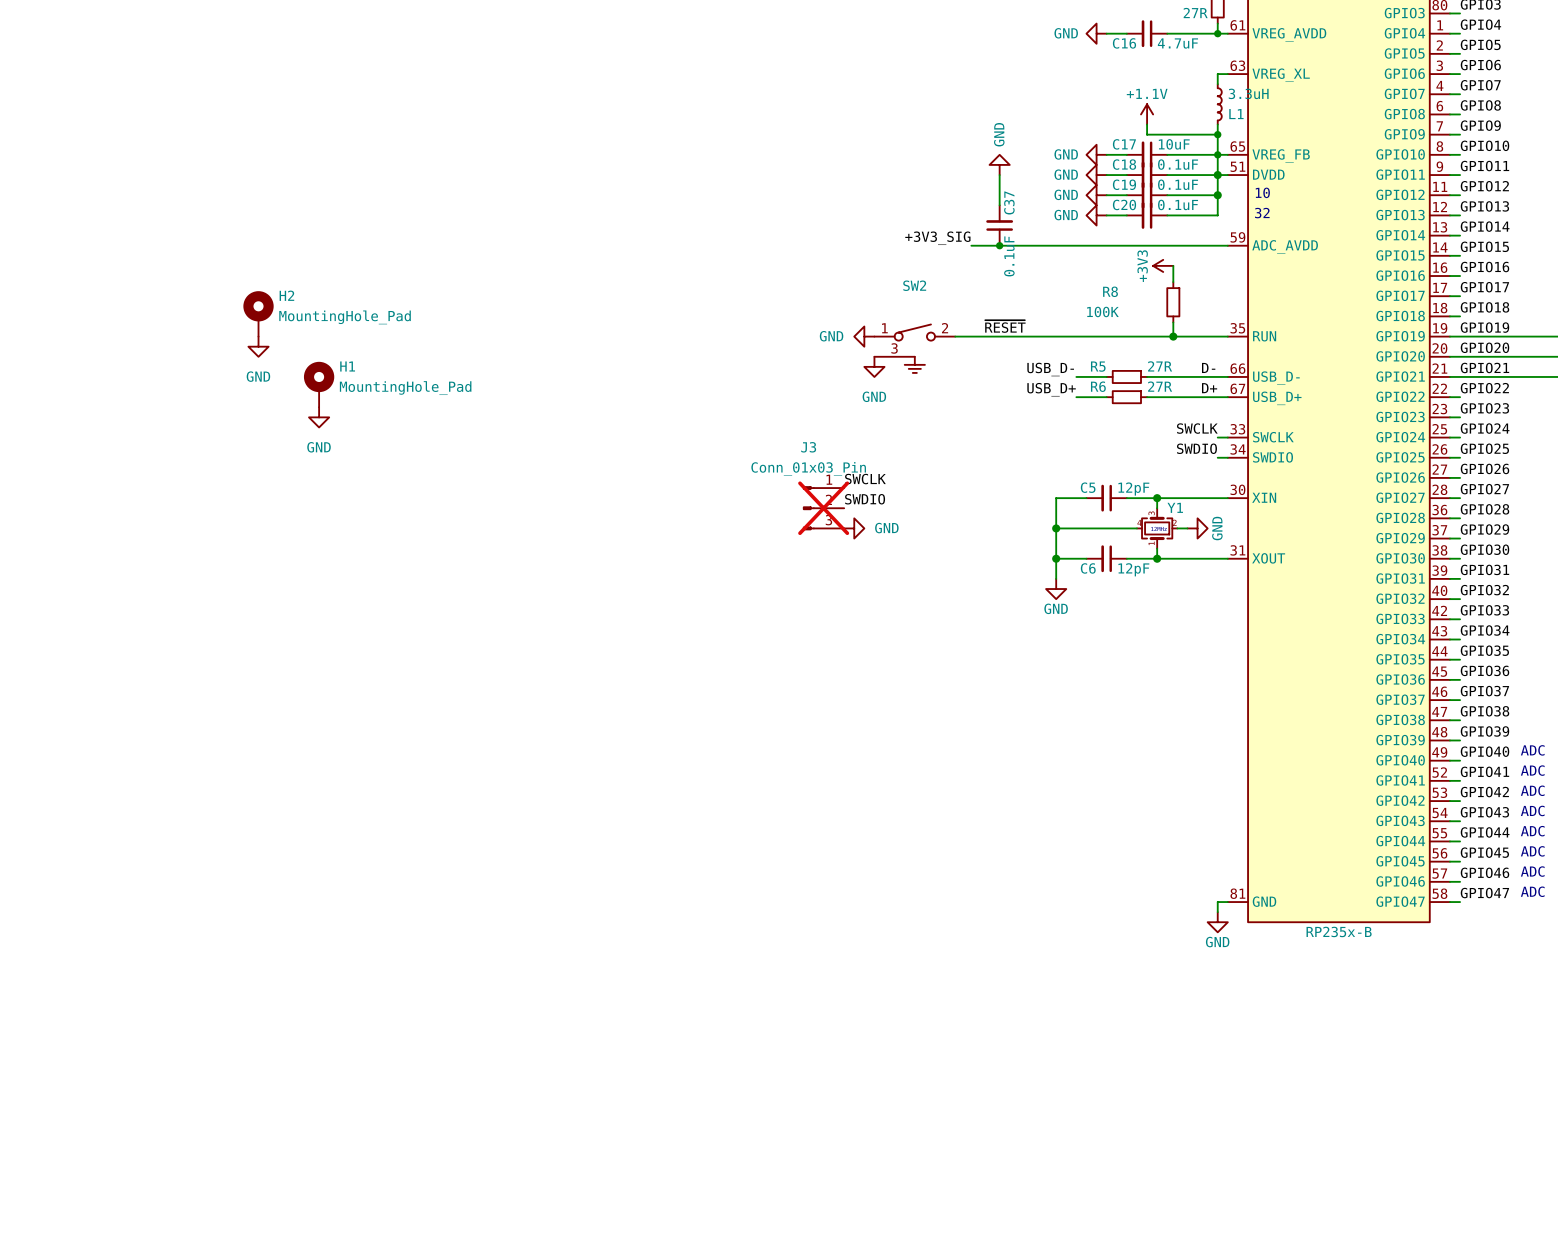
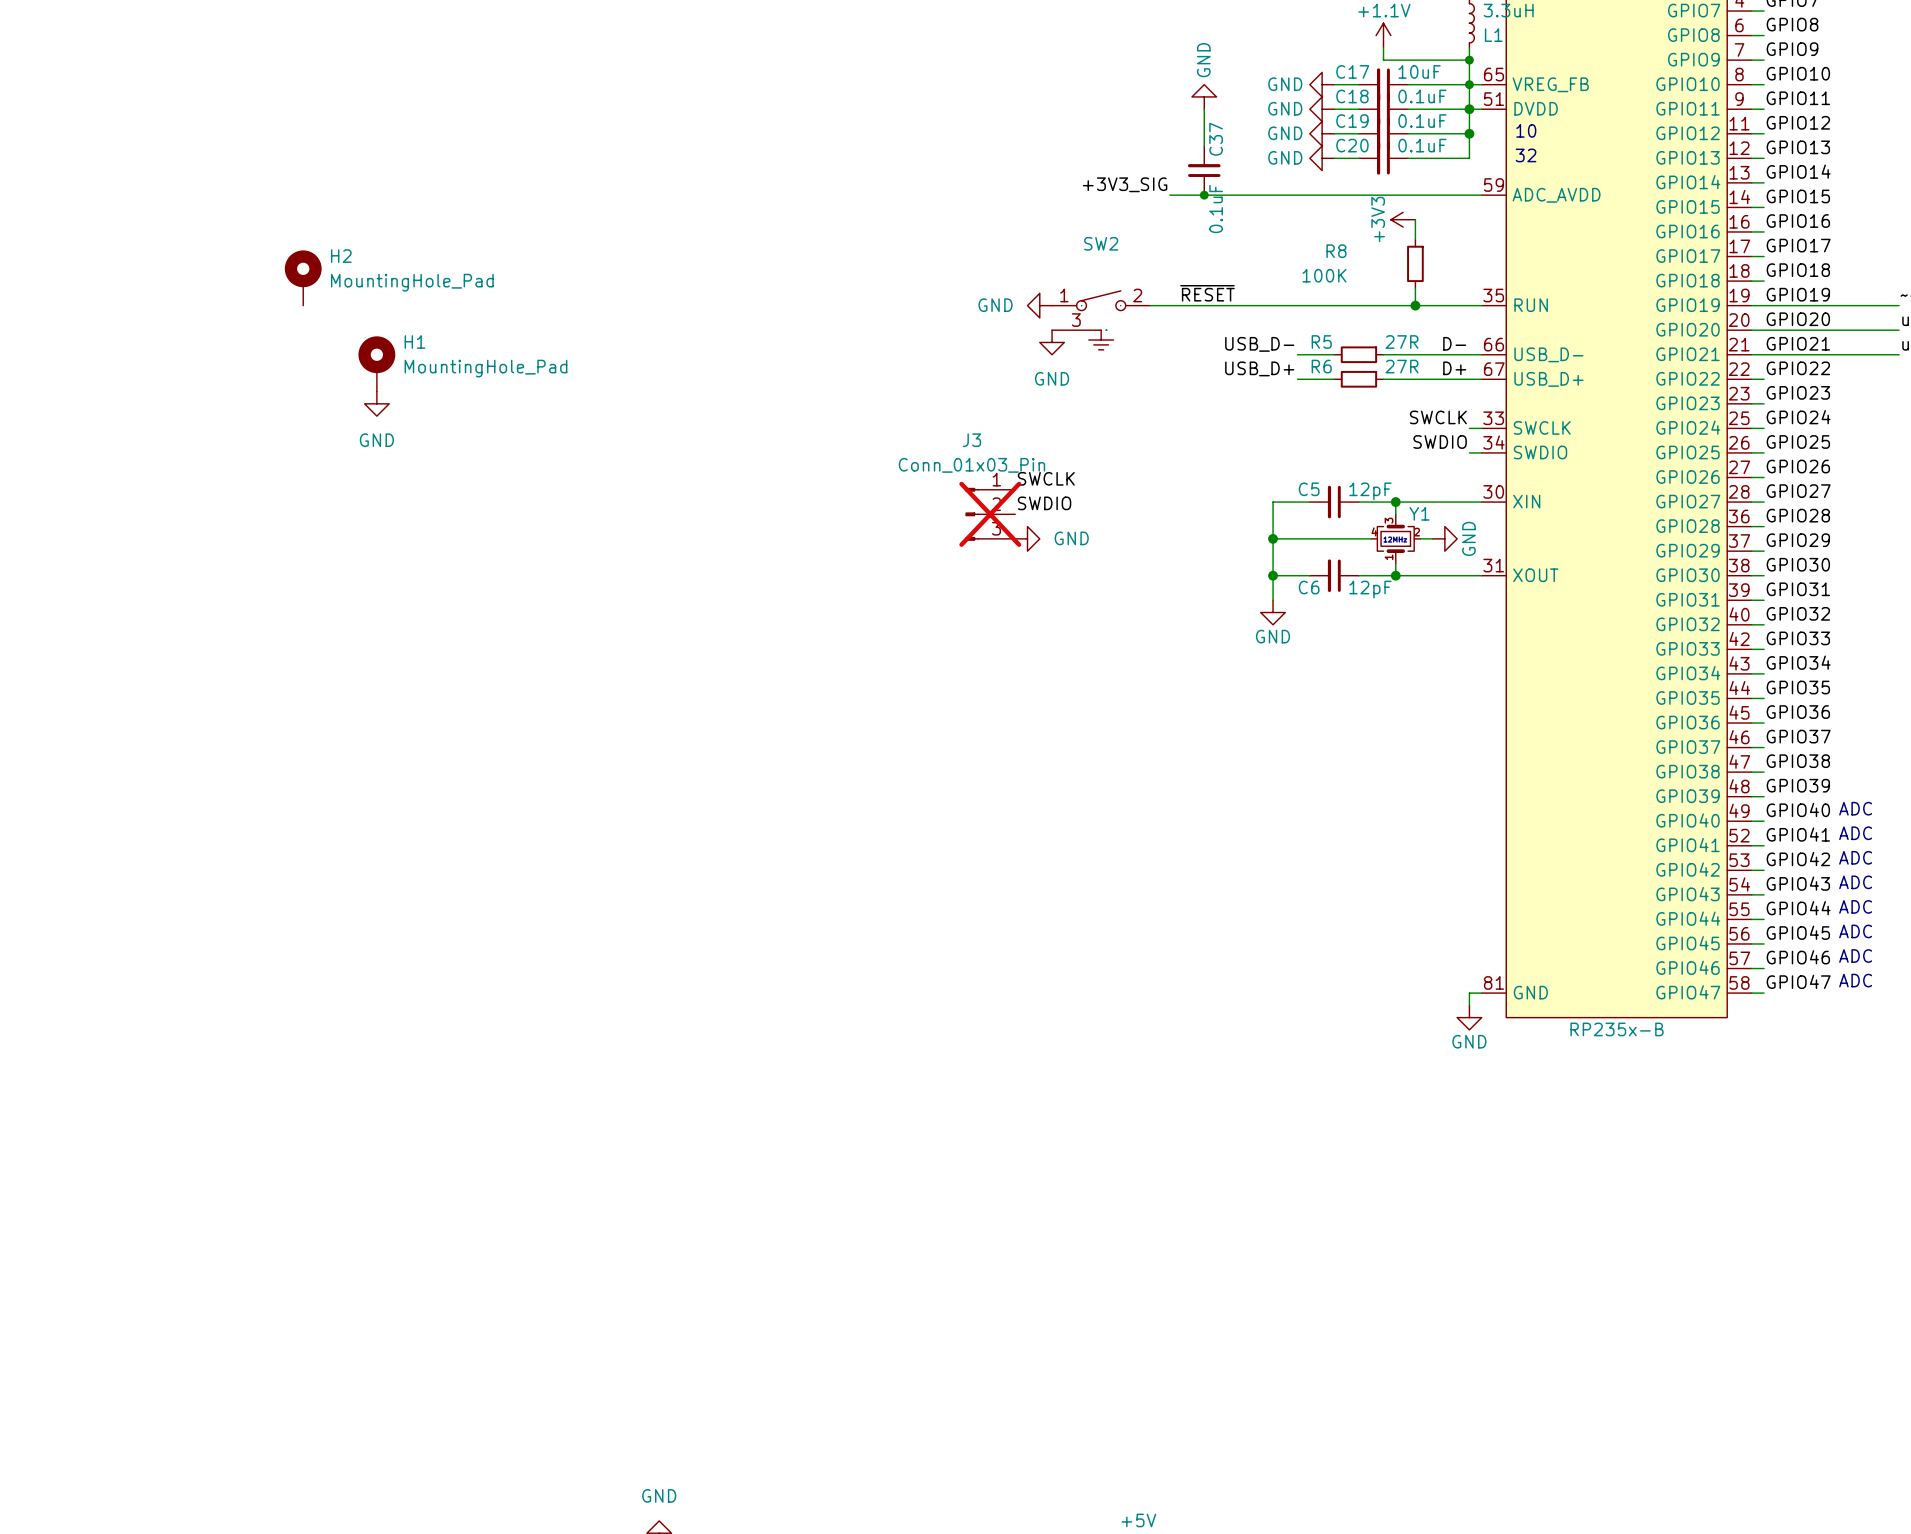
power symbol: GND (258, 346) -> none

